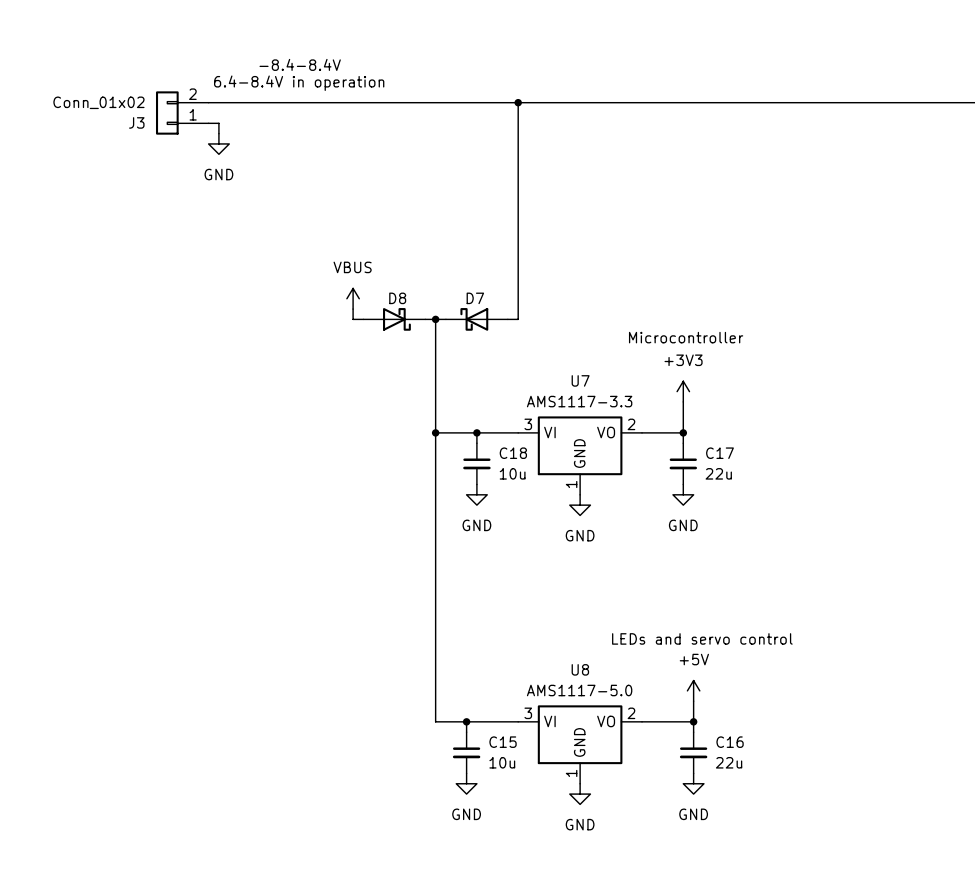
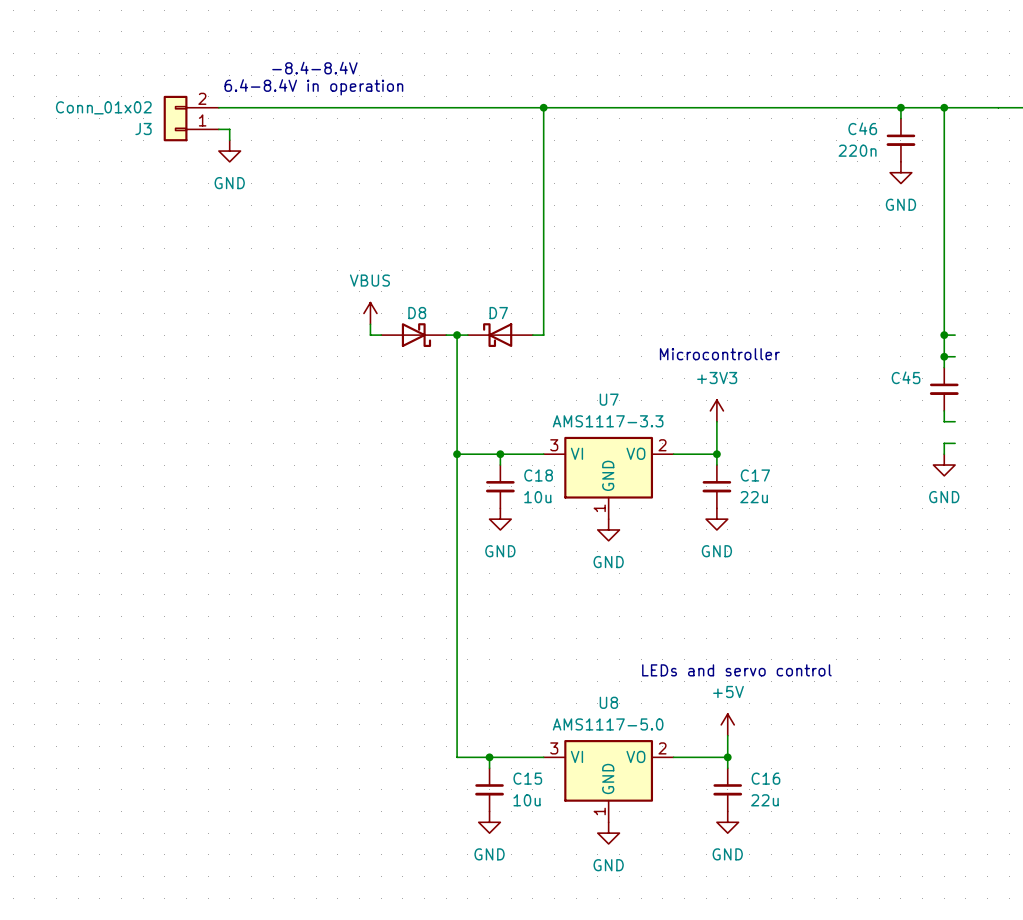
wire: none -> (900, 107) (900, 118)
junction: none -> (900, 107)
wire: none -> (944, 107) (944, 367)
junction: none -> (944, 107)
C46: none -> 220n (900, 140)
power symbol: none -> GND (900, 172)
wire: none -> (944, 335) (955, 335)
junction: none -> (944, 335)
wire: none -> (944, 356) (955, 356)
junction: none -> (944, 356)
C45: none -> (944, 389)
wire: none -> (944, 410) (944, 421) (955, 421)
wire: none -> (955, 443) (944, 443) (944, 454)
power symbol: none -> GND (944, 465)

